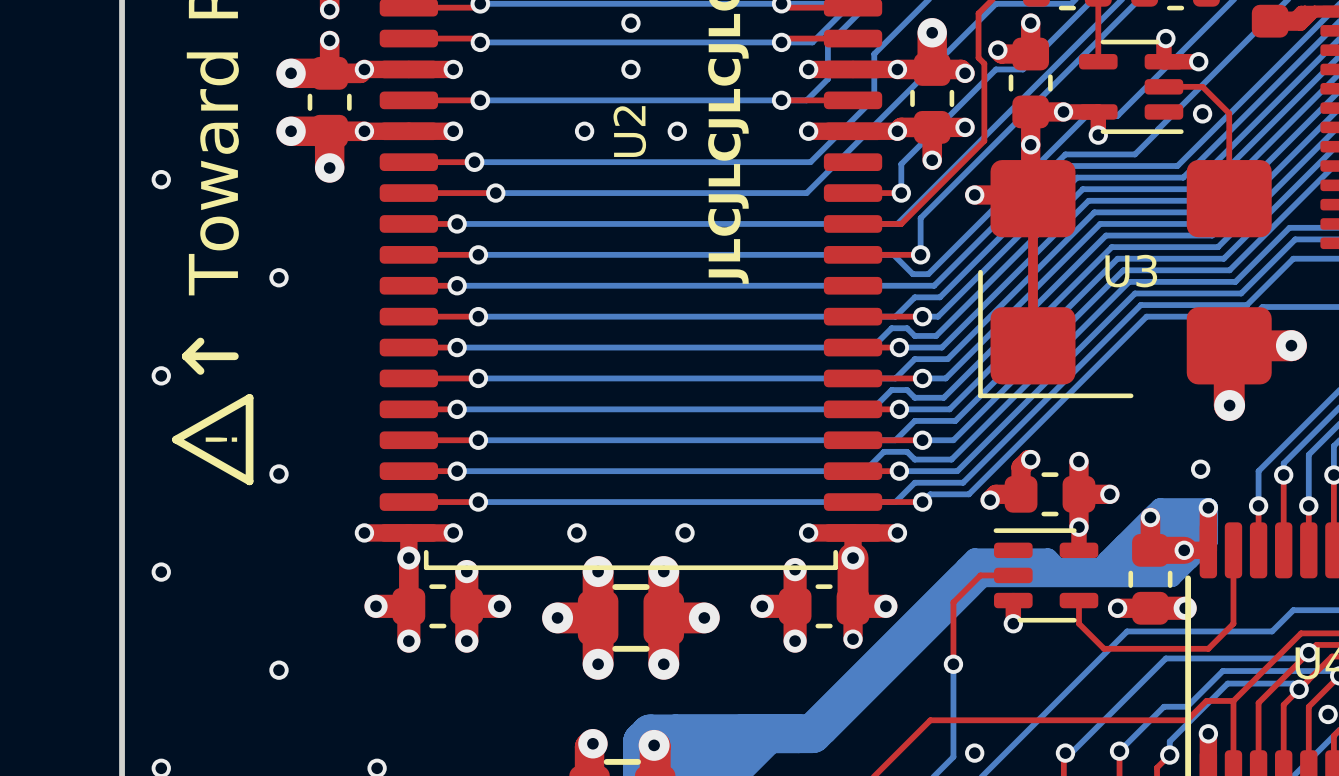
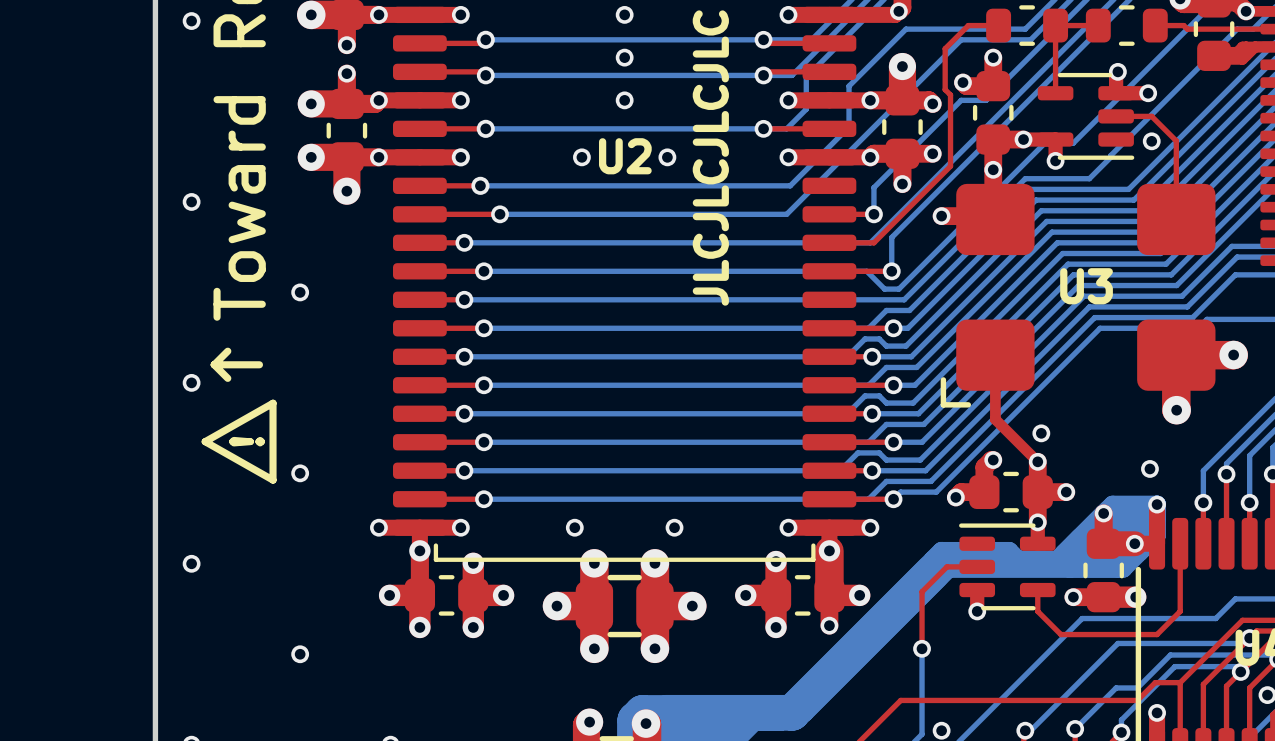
U2 name rotation: 0° (629, 131) -> 90° clockwise (625, 156)
U3 footprint: [978, 160, 1272, 399] -> [940, 183, 1216, 408]
top track: (1033, 198) (1033, 345) -> (1037, 461) (995, 419) (995, 355)
via: none -> (1041, 433)

